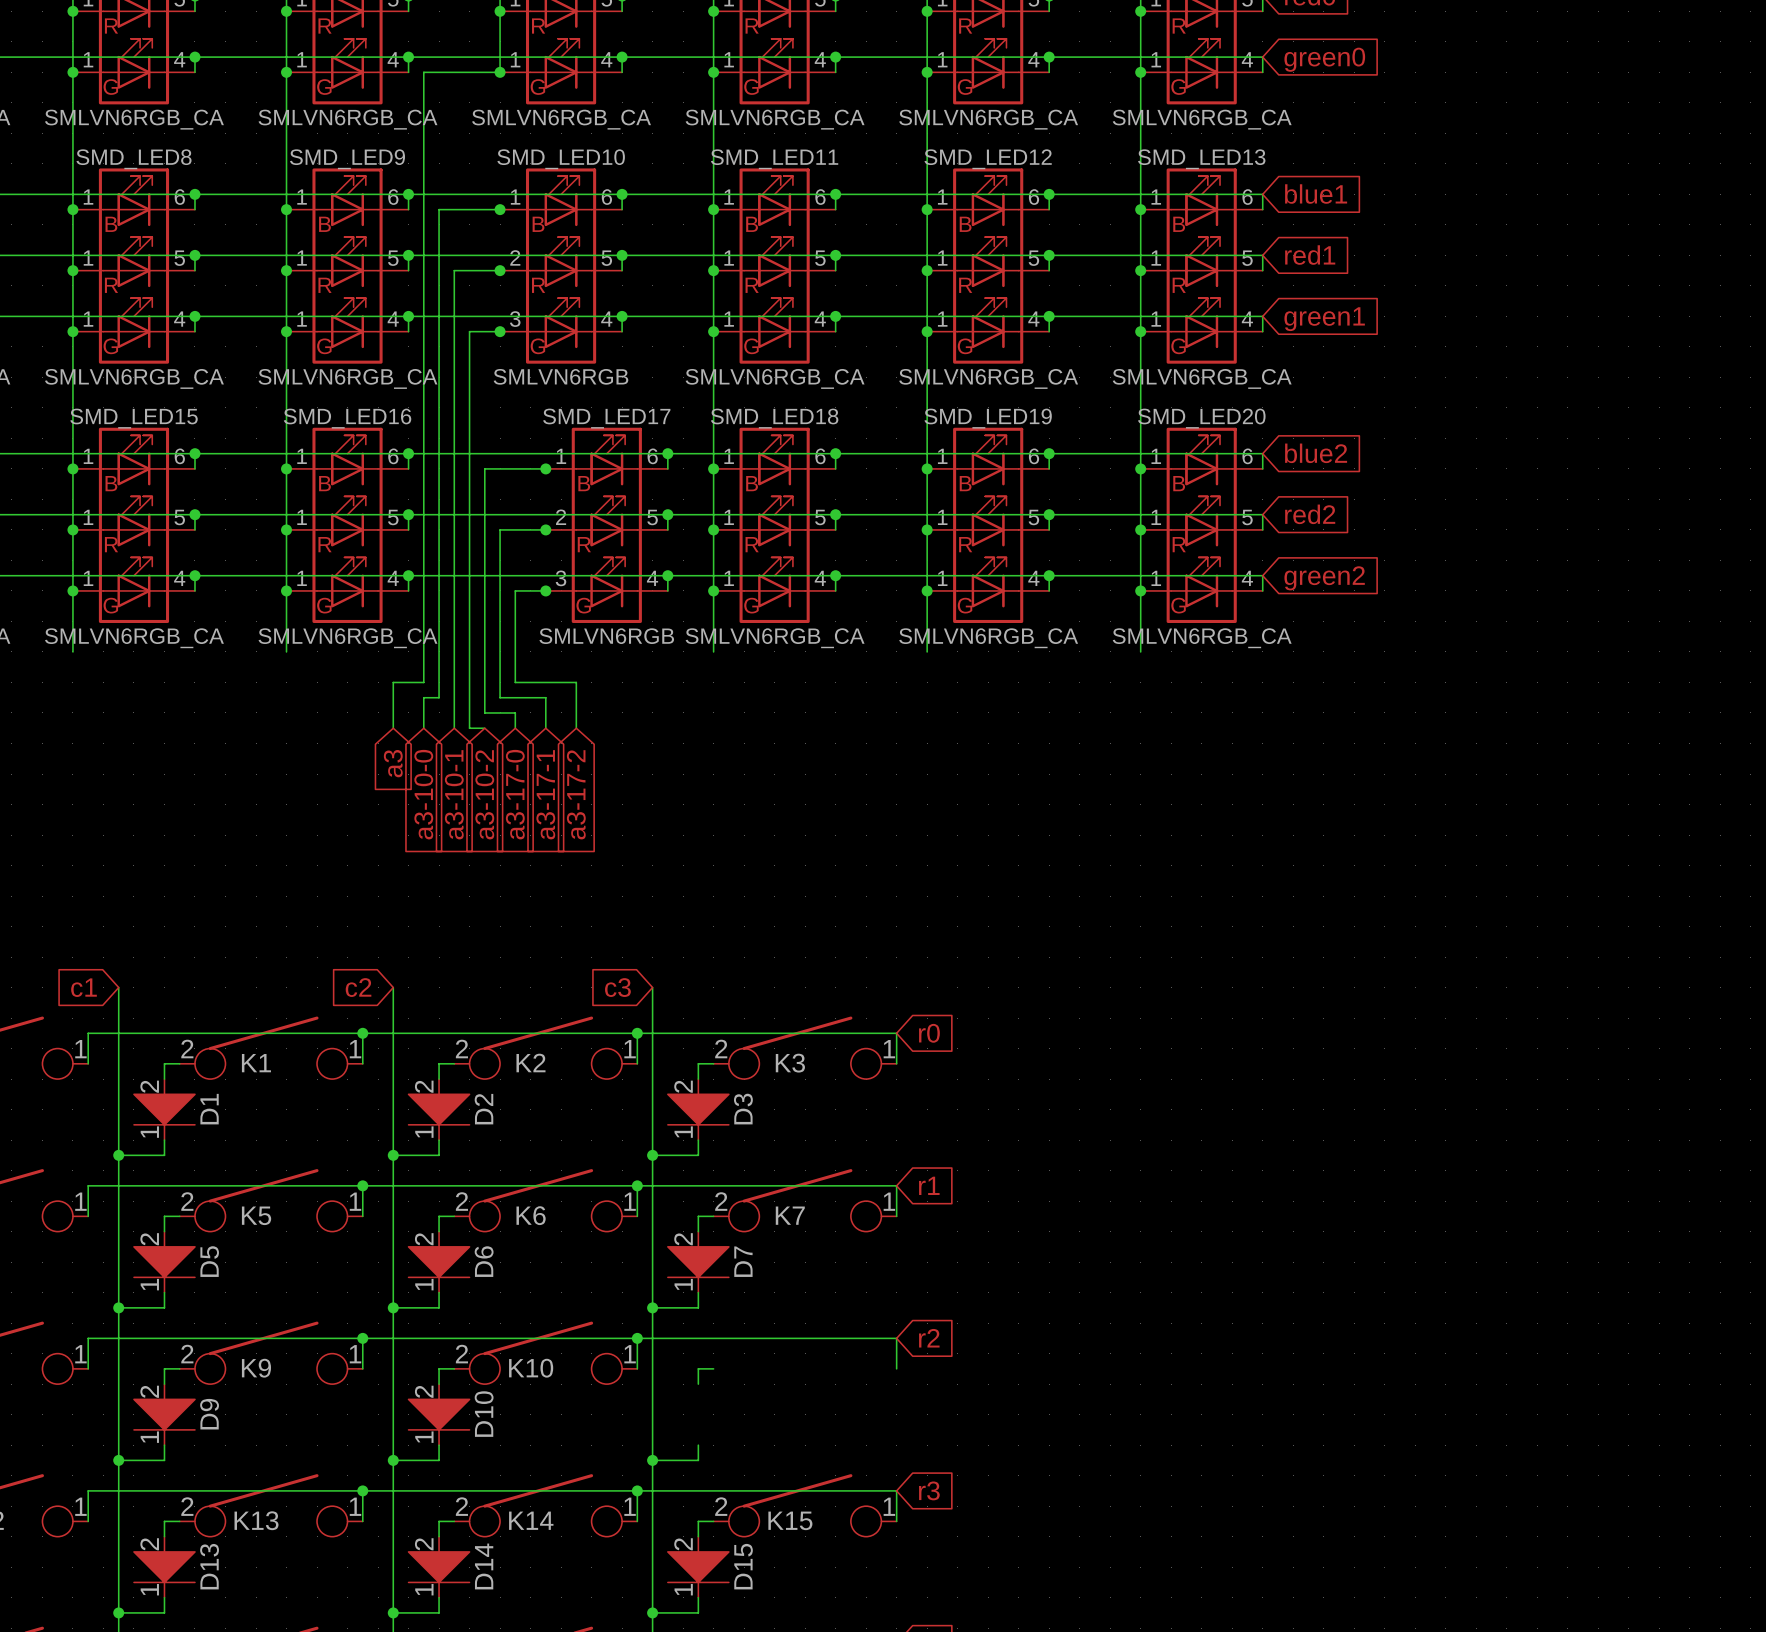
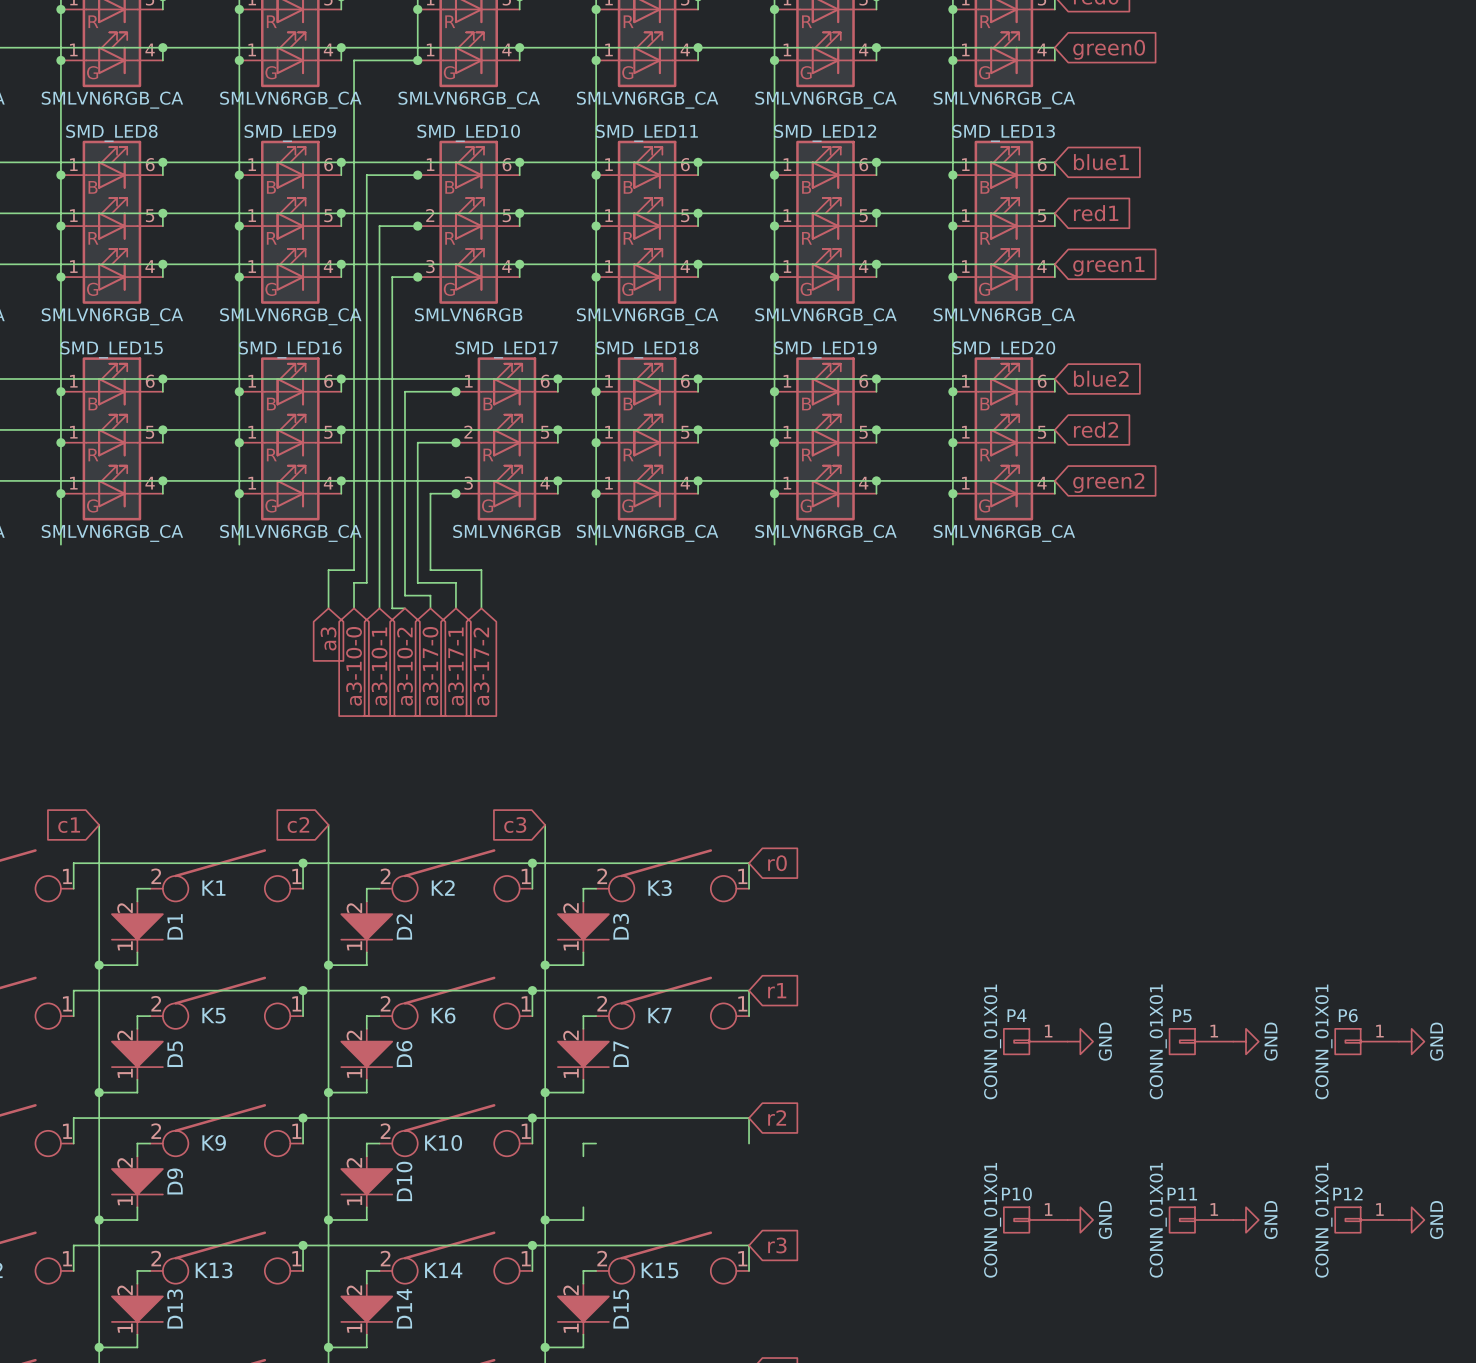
P4: none -> CONN_01X01 (1035, 1041)
power symbol: none -> GND (1080, 1041)
P5: none -> CONN_01X01 (1201, 1041)
power symbol: none -> GND (1245, 1041)
P6: none -> CONN_01X01 (1367, 1041)
power symbol: none -> GND (1411, 1041)
P10: none -> CONN_01X01 (1035, 1219)
power symbol: none -> GND (1080, 1219)
P11: none -> CONN_01X01 (1201, 1219)
power symbol: none -> GND (1245, 1219)
P12: none -> CONN_01X01 (1367, 1219)
power symbol: none -> GND (1411, 1219)

